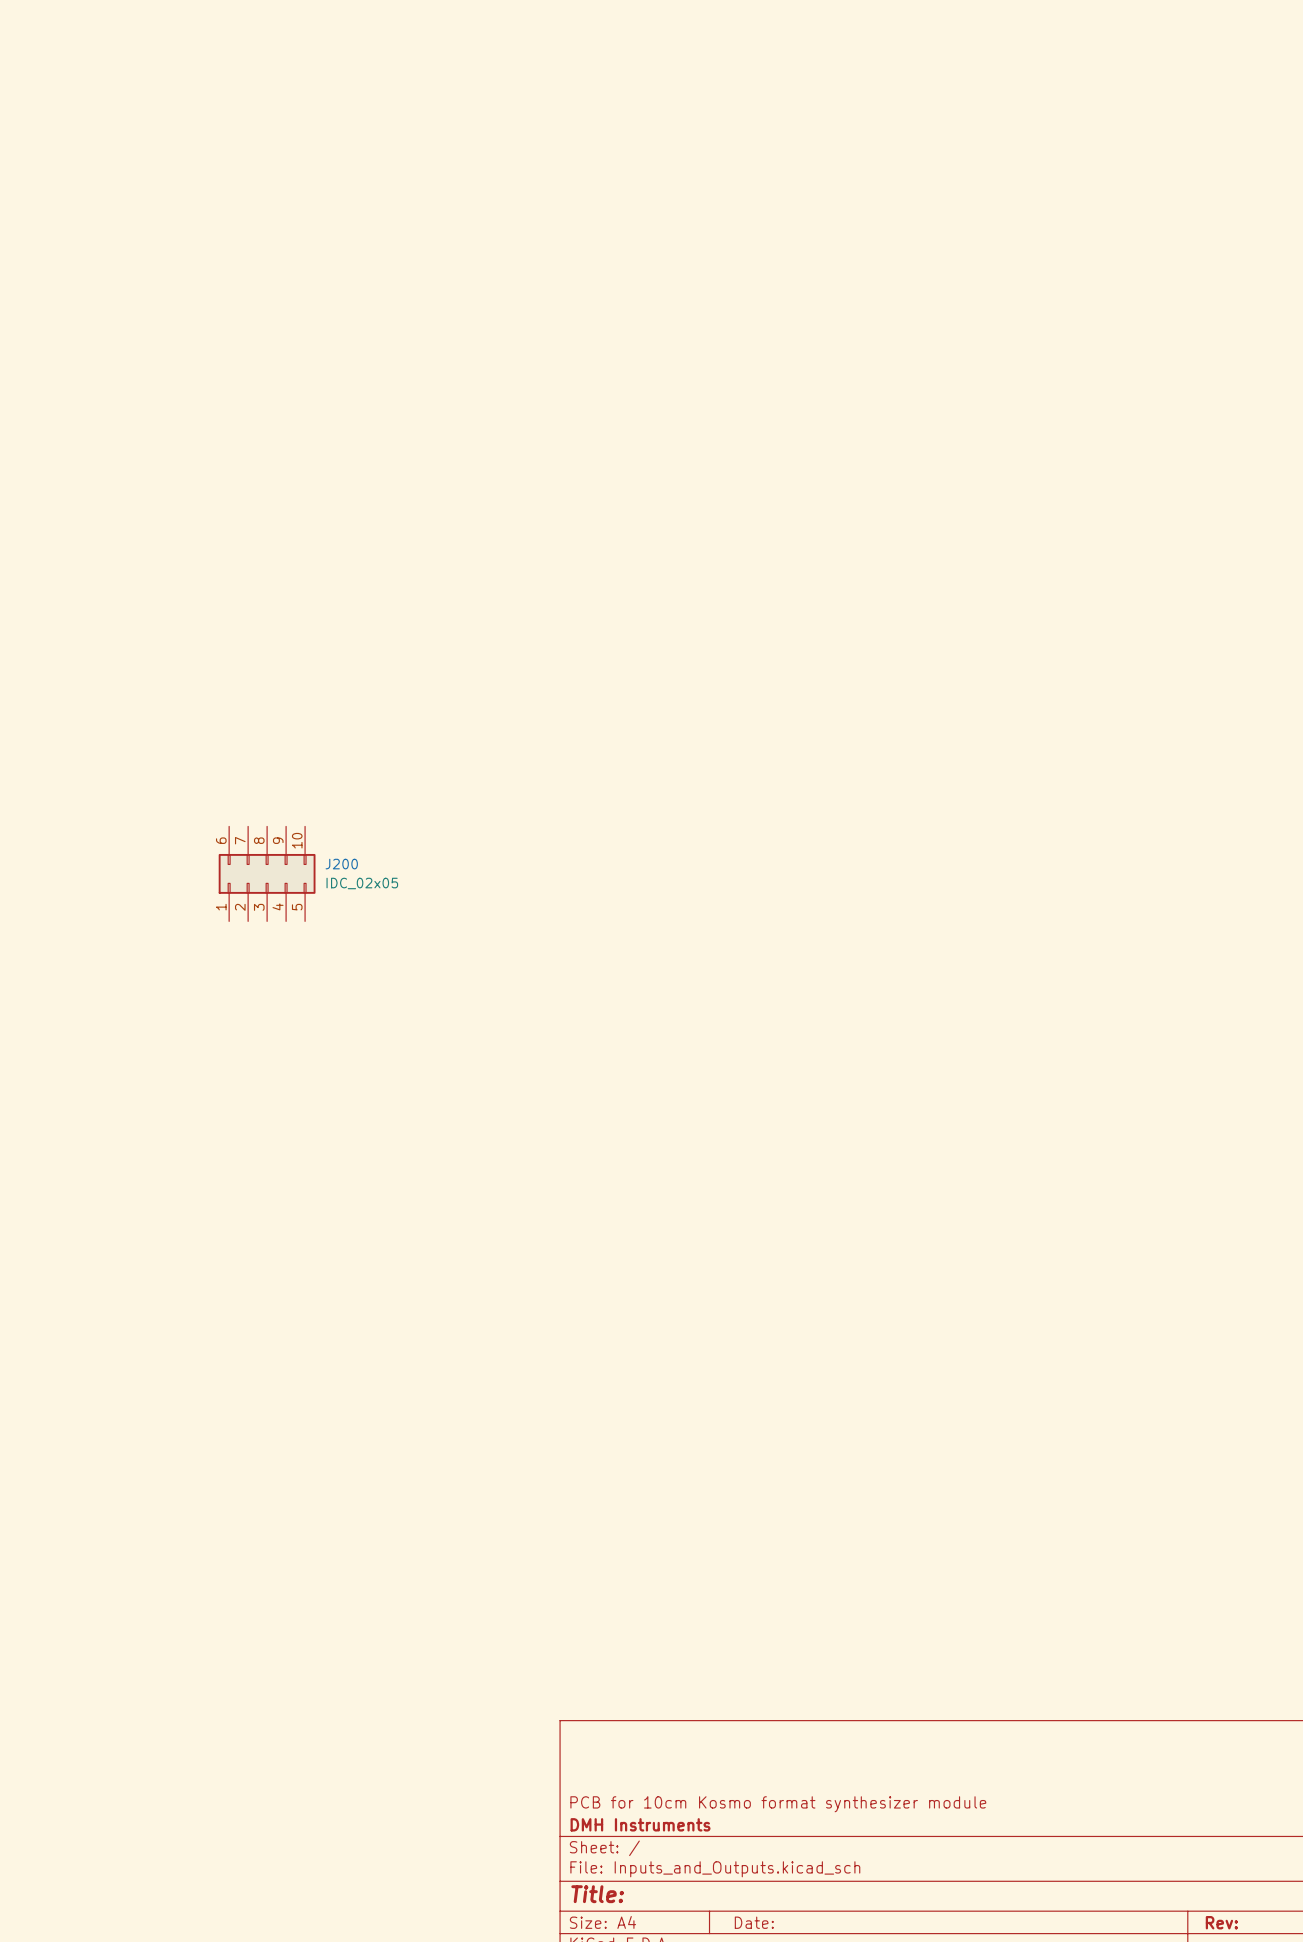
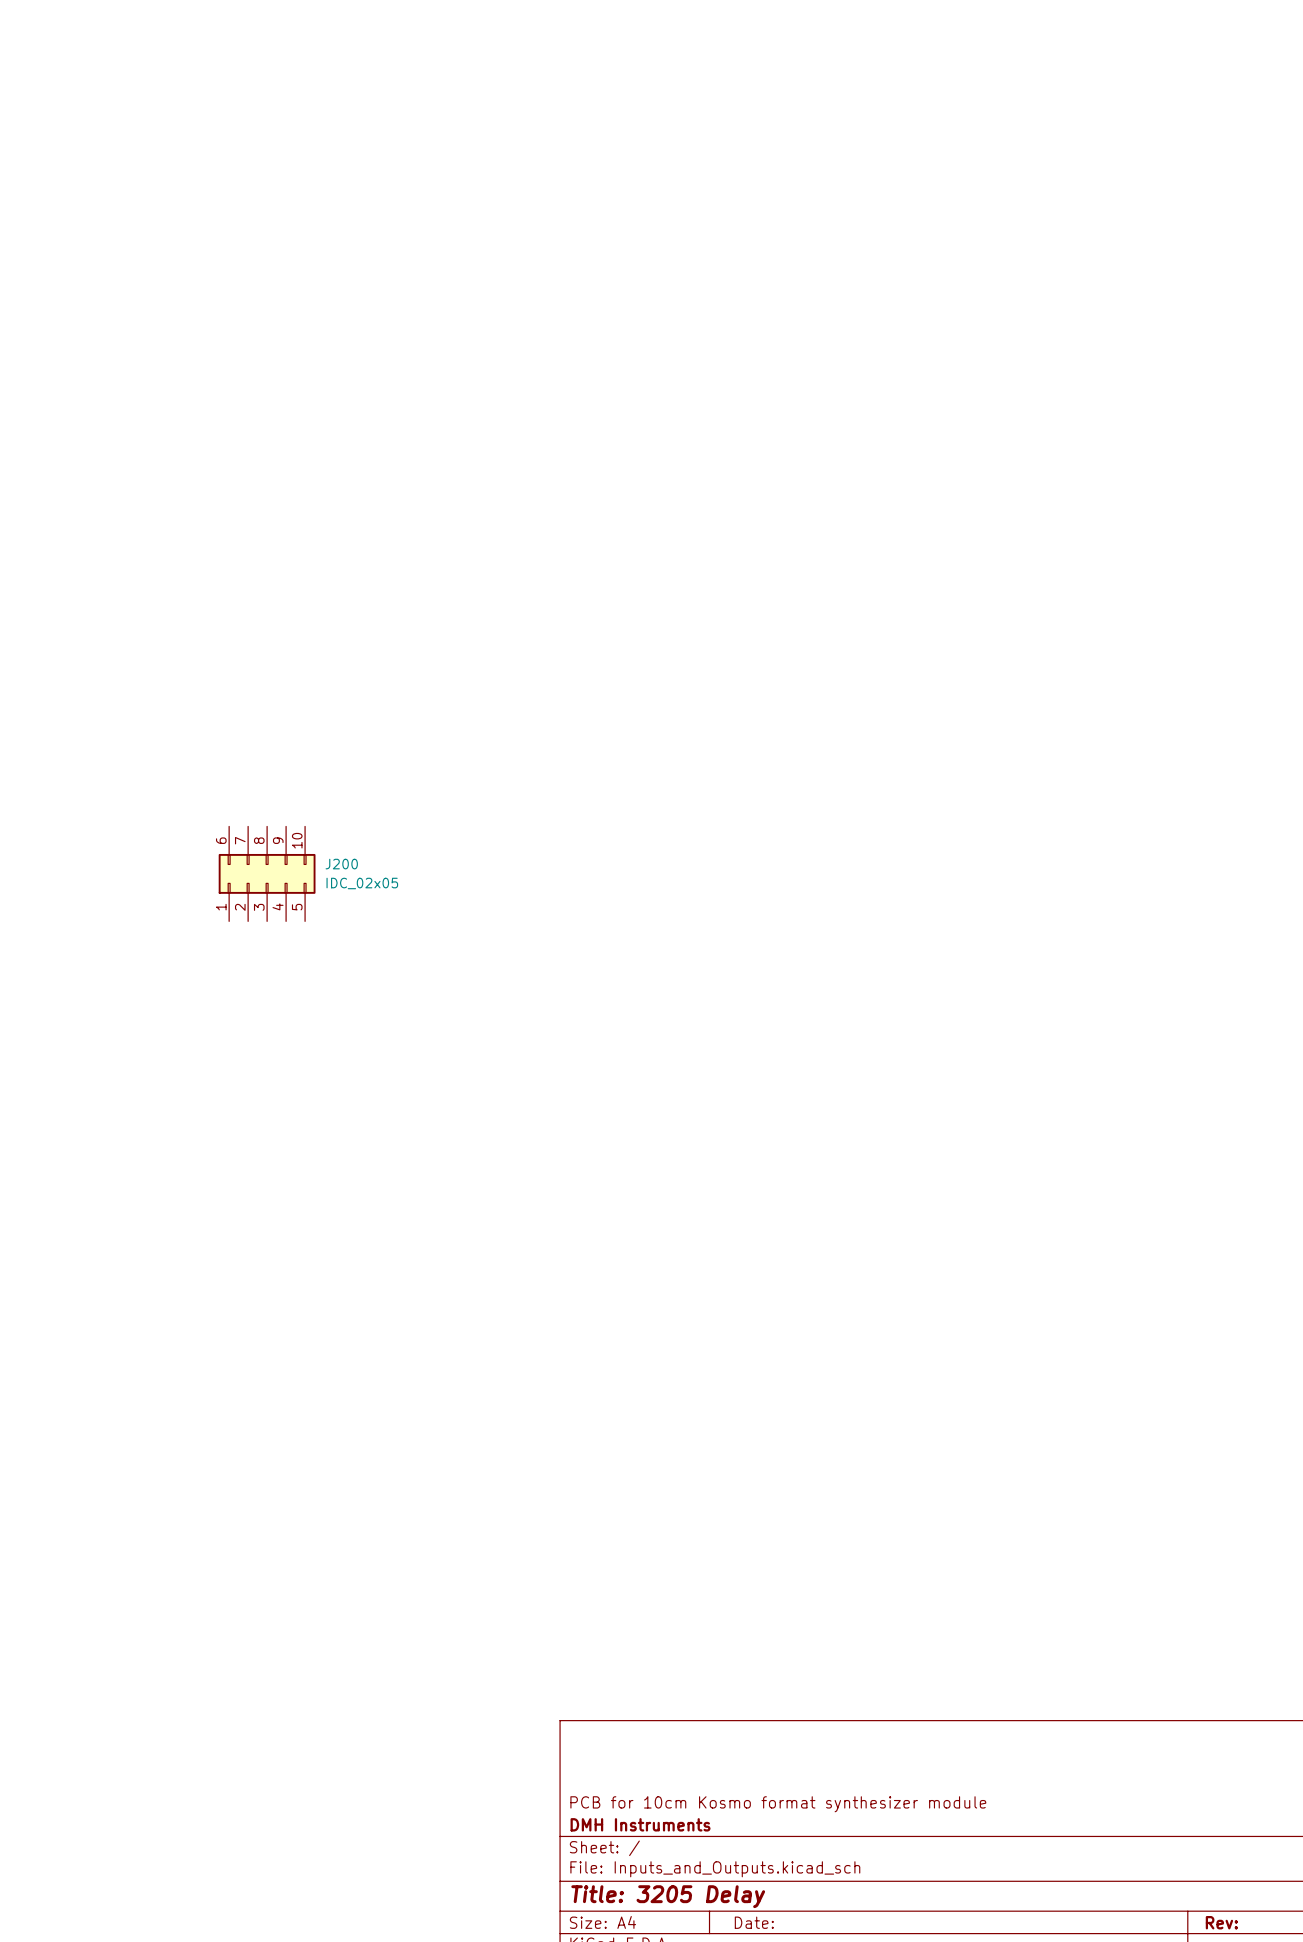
title block: Title: (597, 1894) -> Title: 3205 Delay (668, 1896)

